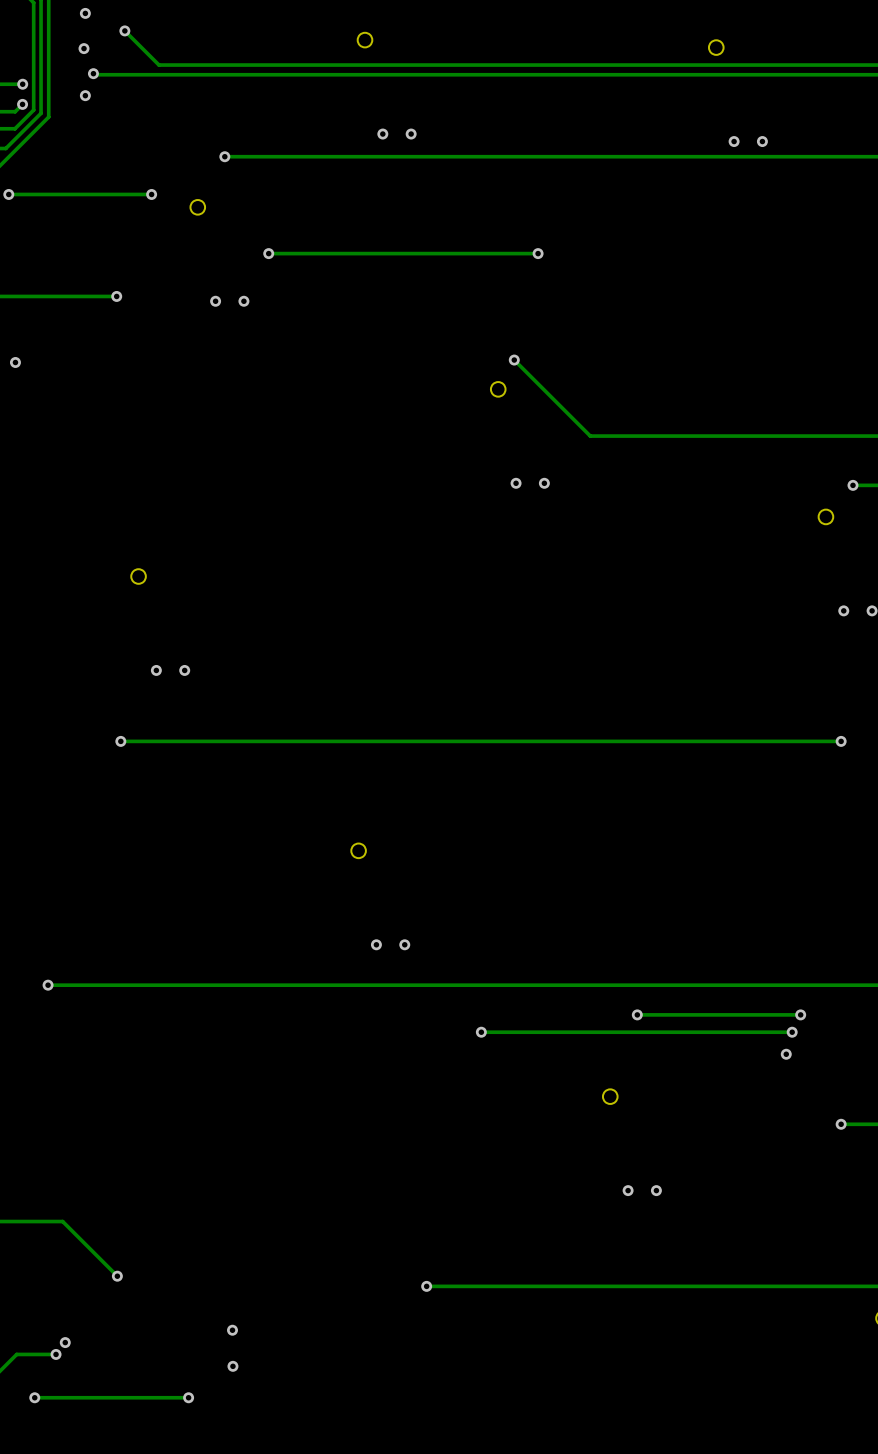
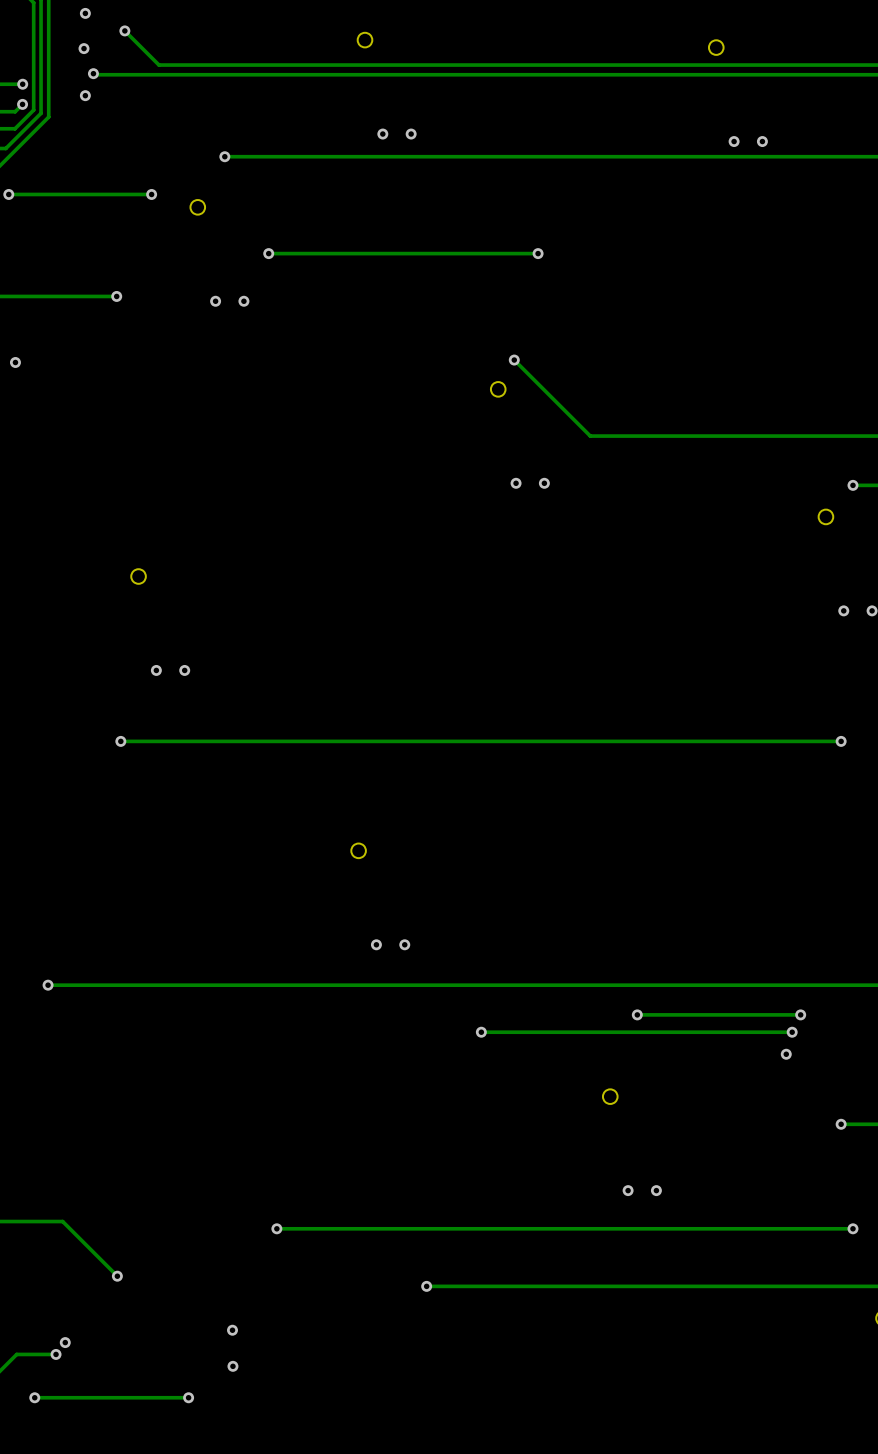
via: none -> (276, 1228)
track: none -> (852, 1228) (276, 1228)
via: none -> (852, 1228)

